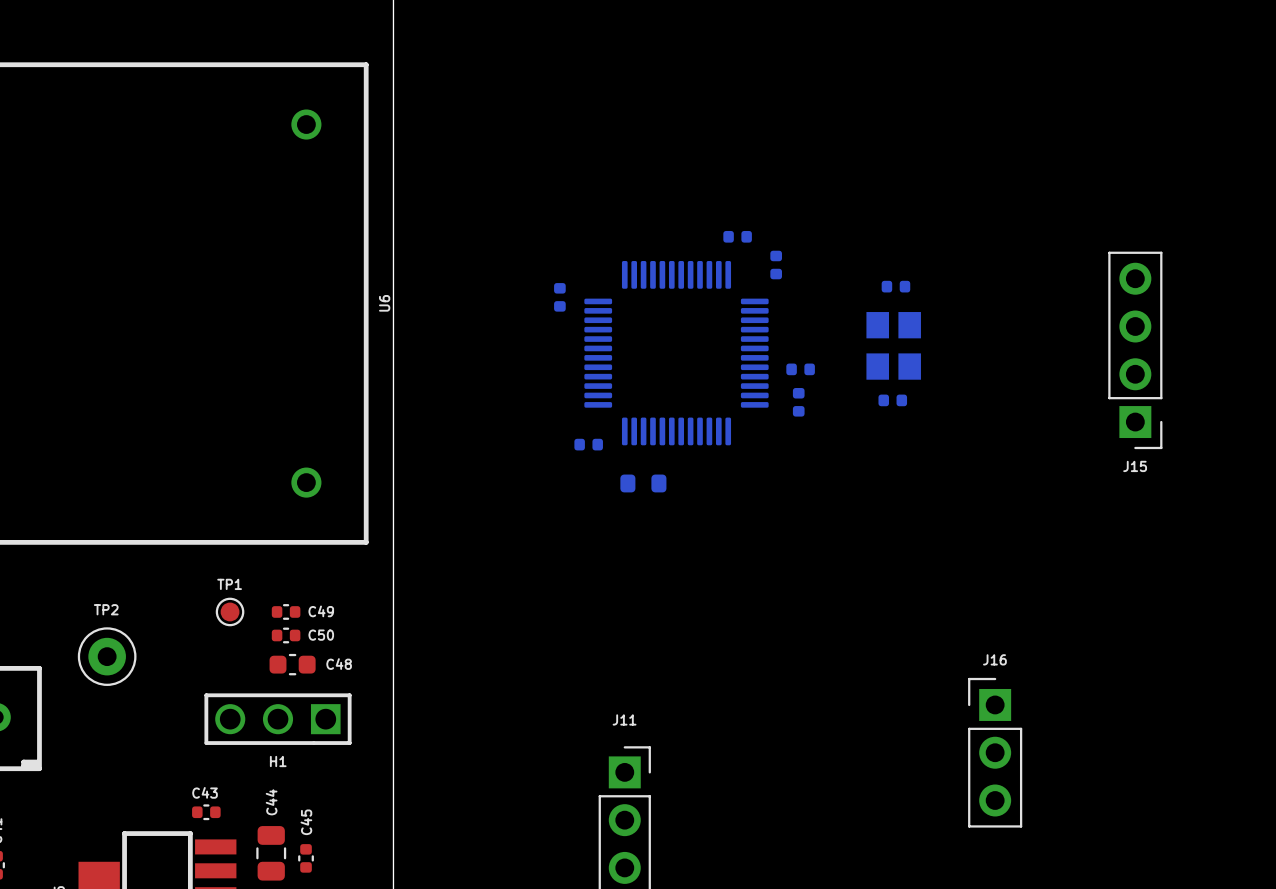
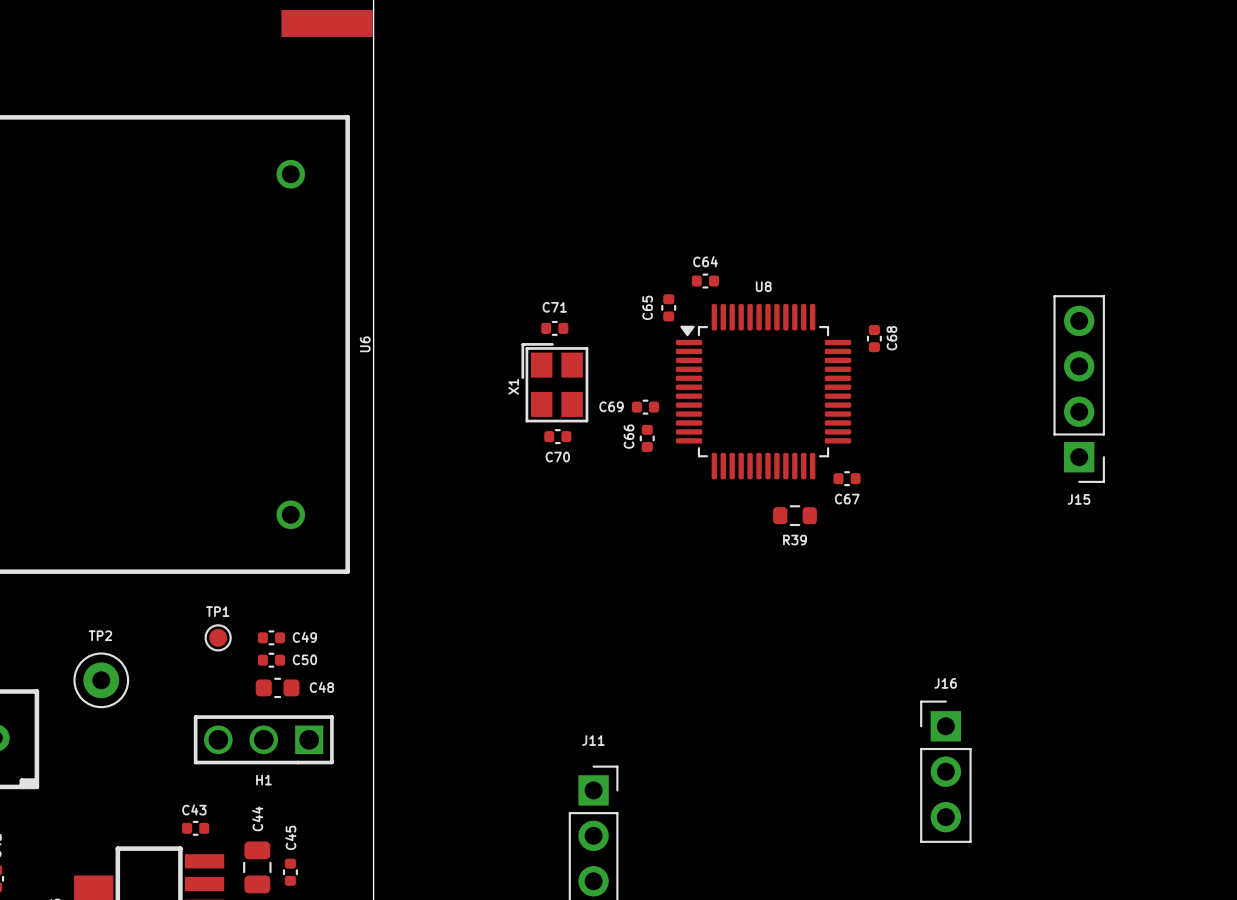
C64 side: bottom (737, 236) -> top (705, 281)
C65 side: bottom (776, 265) -> top (668, 307)
C71 side: bottom (895, 286) -> top (554, 328)
C68 side: bottom (559, 297) -> top (874, 338)
X1 side: bottom (893, 345) -> top (554, 382)
U8 side: bottom (676, 353) -> top (763, 391)
C69 side: bottom (800, 369) -> top (645, 407)
C70 side: bottom (892, 400) -> top (557, 436)
C66 side: bottom (798, 402) -> top (647, 438)
C67 side: bottom (588, 444) -> top (847, 478)
R39 side: bottom (643, 483) -> top (794, 515)

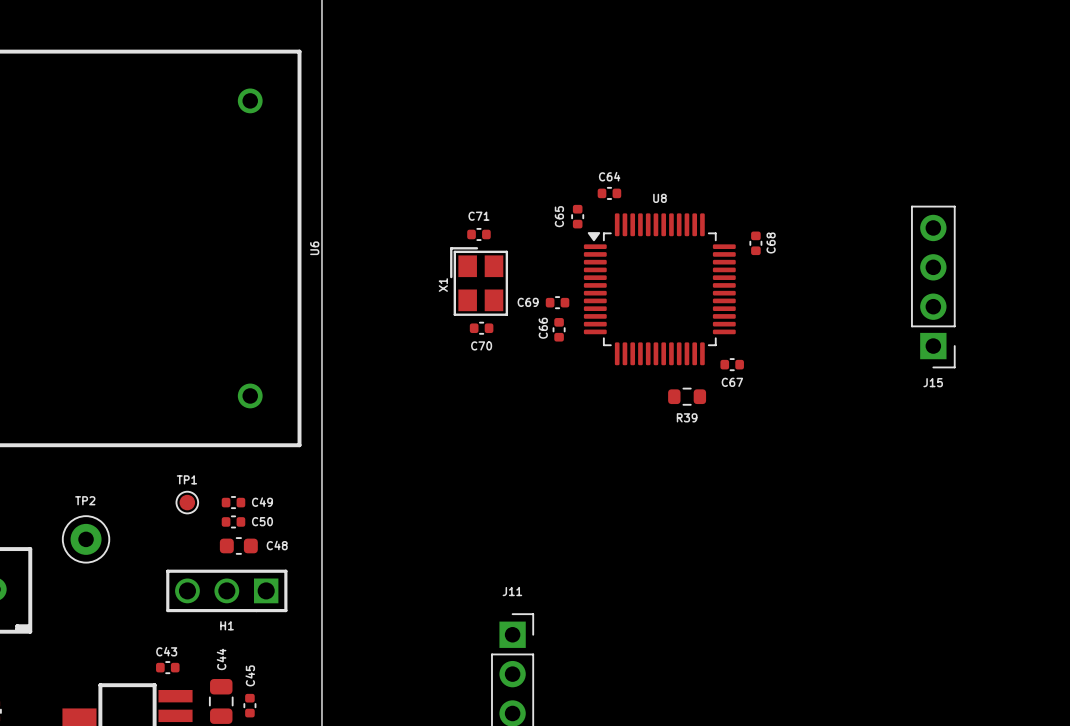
J16: (945, 771) -> none

